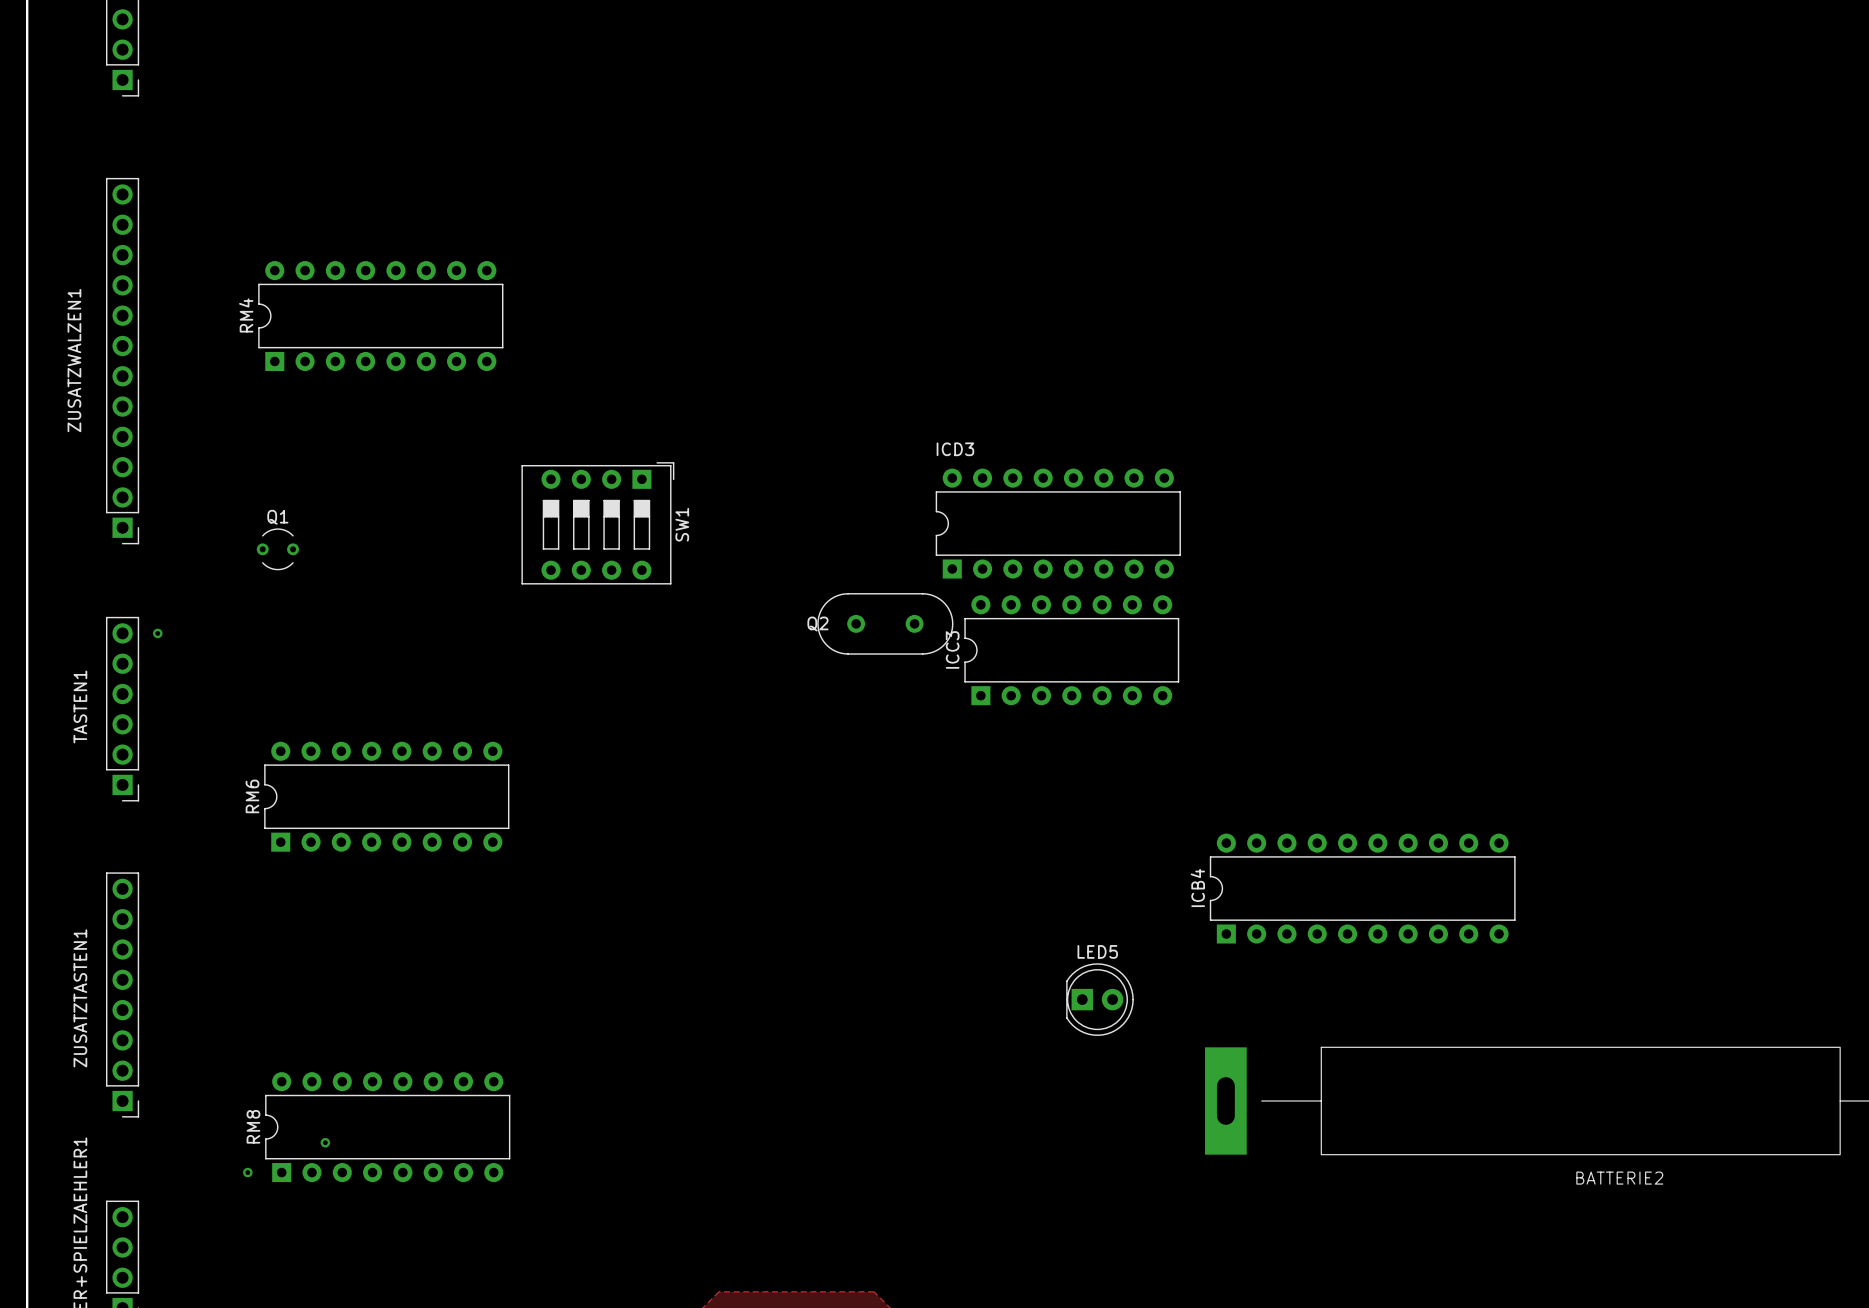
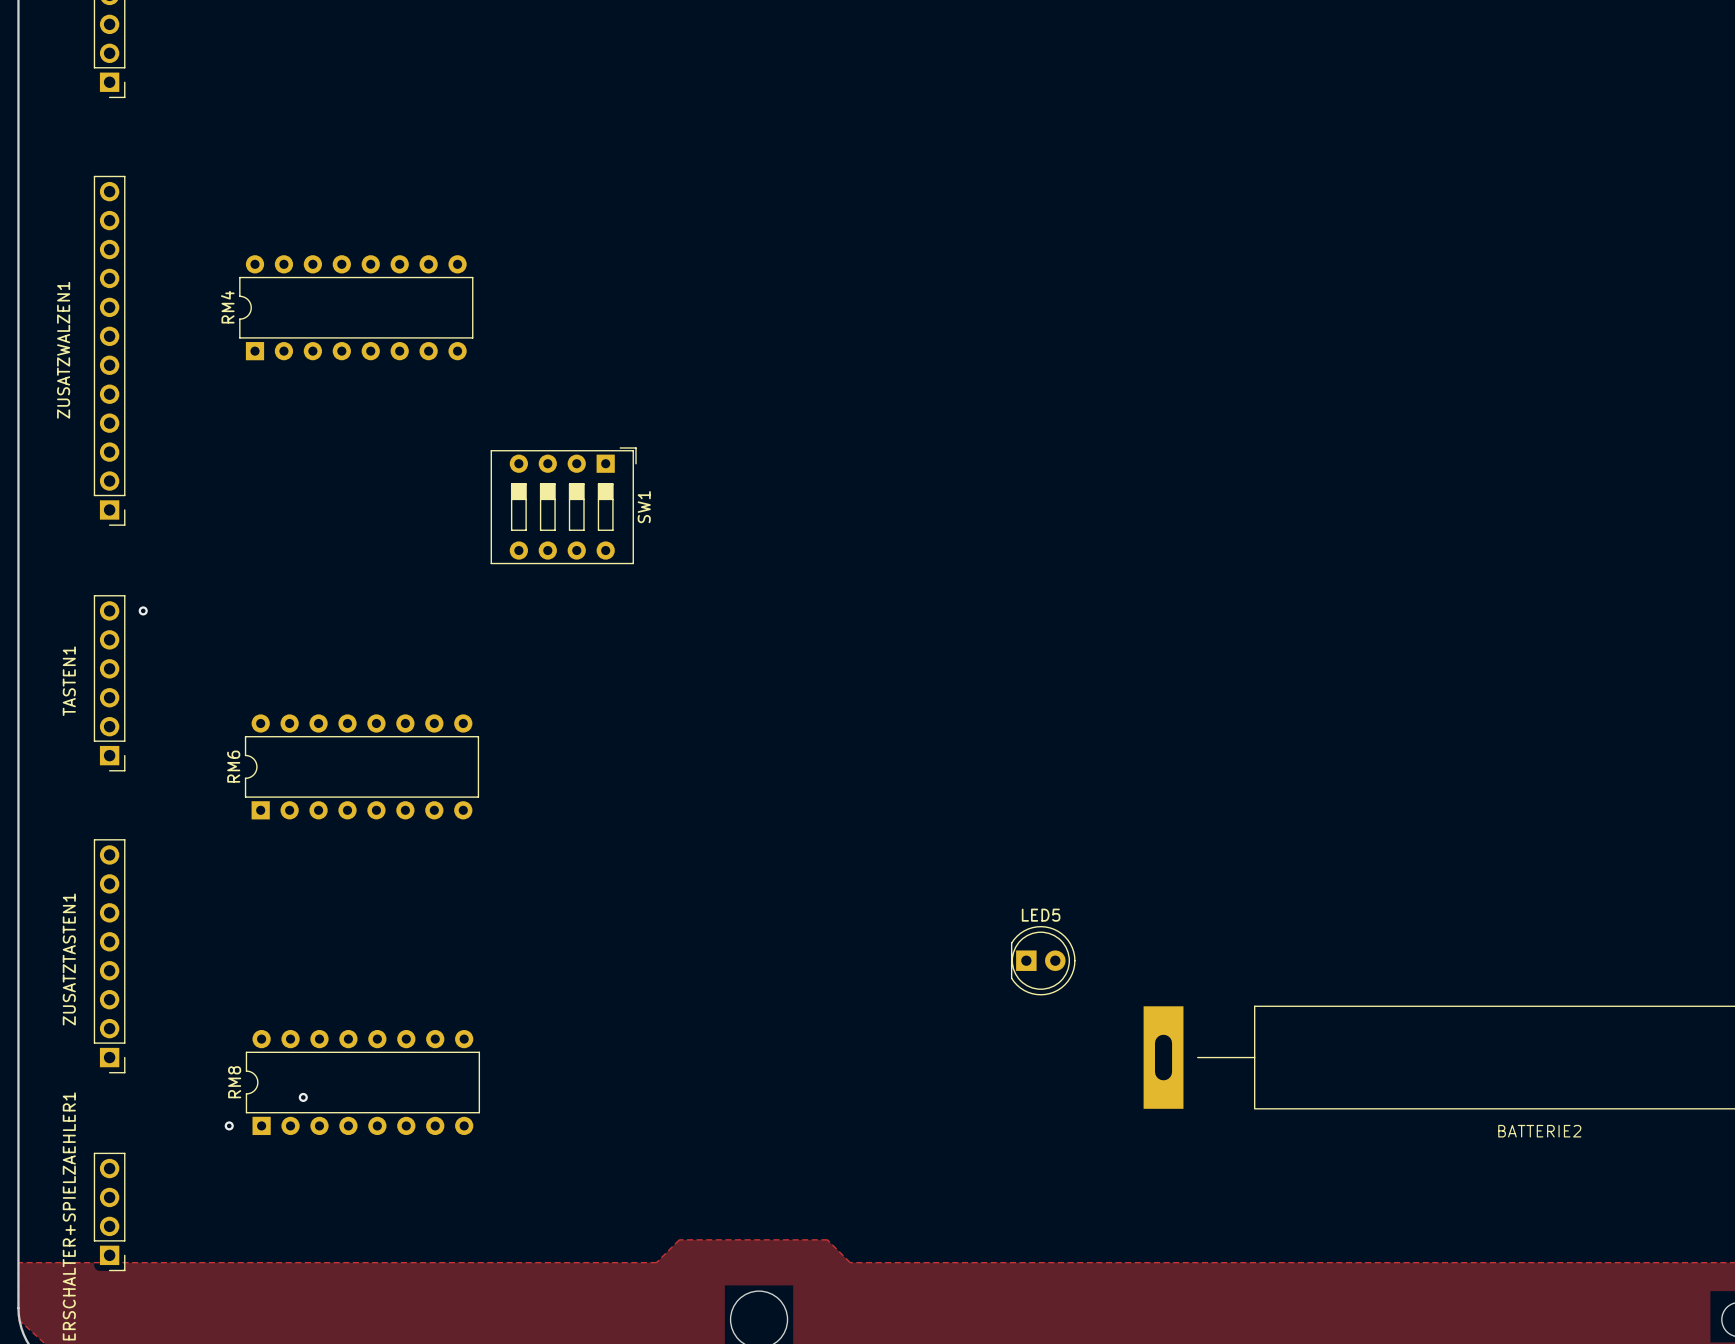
ICD3: (1058, 523) -> none
Q1: (277, 549) -> none
Q2: (885, 623) -> none
ICC3: (1071, 650) -> none
ICB4: (1362, 888) -> none

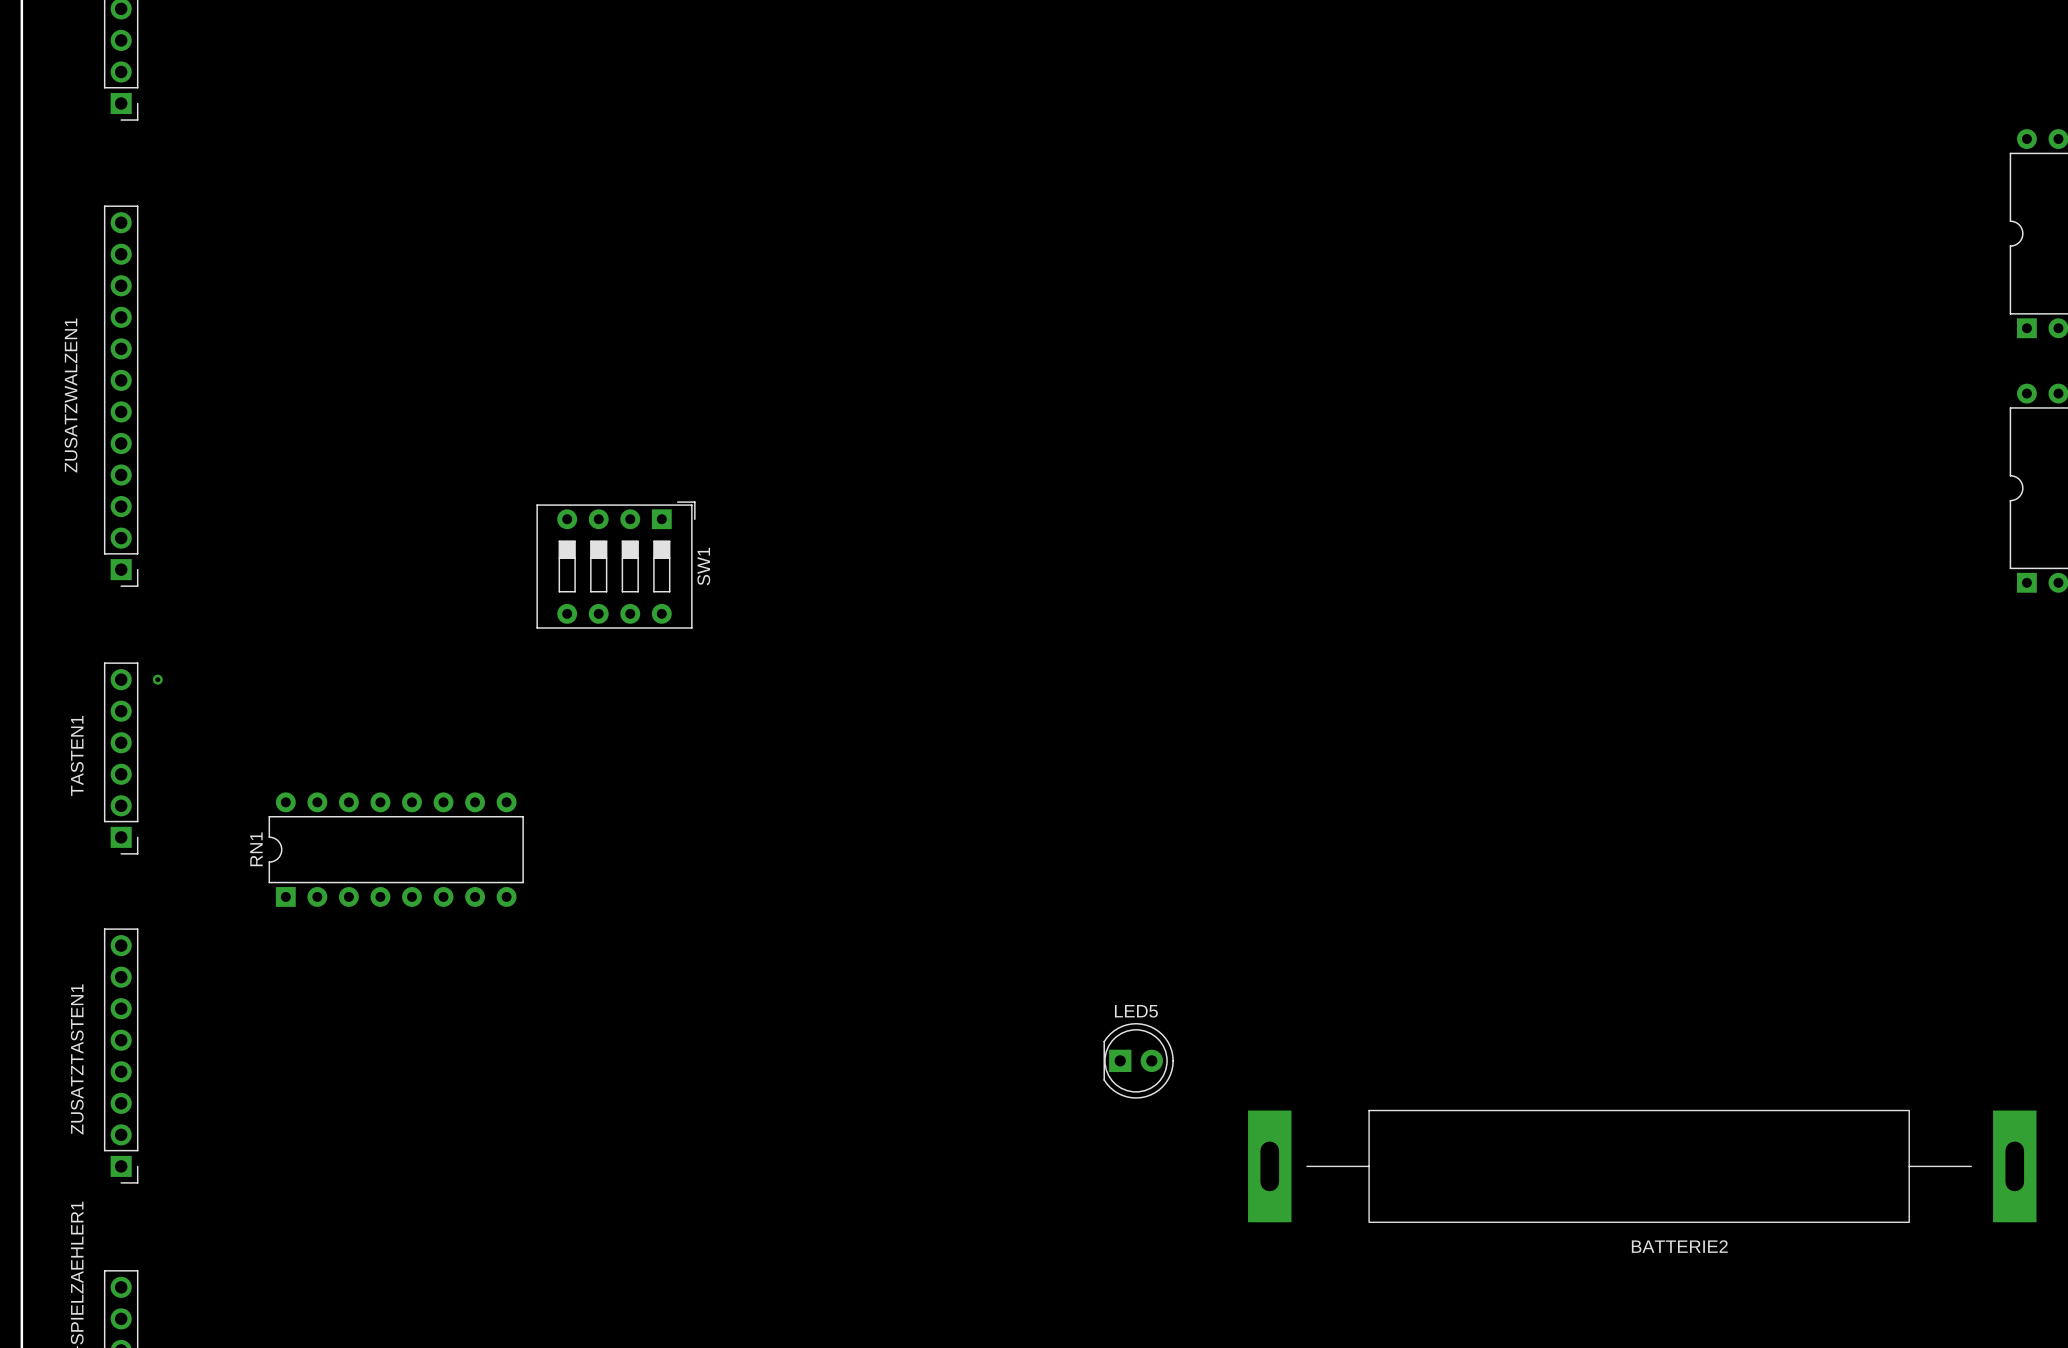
RM4: (356, 307) -> none
RM6 name: RM6 (233, 766) -> RN1 (256, 849)
RM8: (362, 1082) -> none
via: (303, 1097) -> none
via: (229, 1125) -> none

